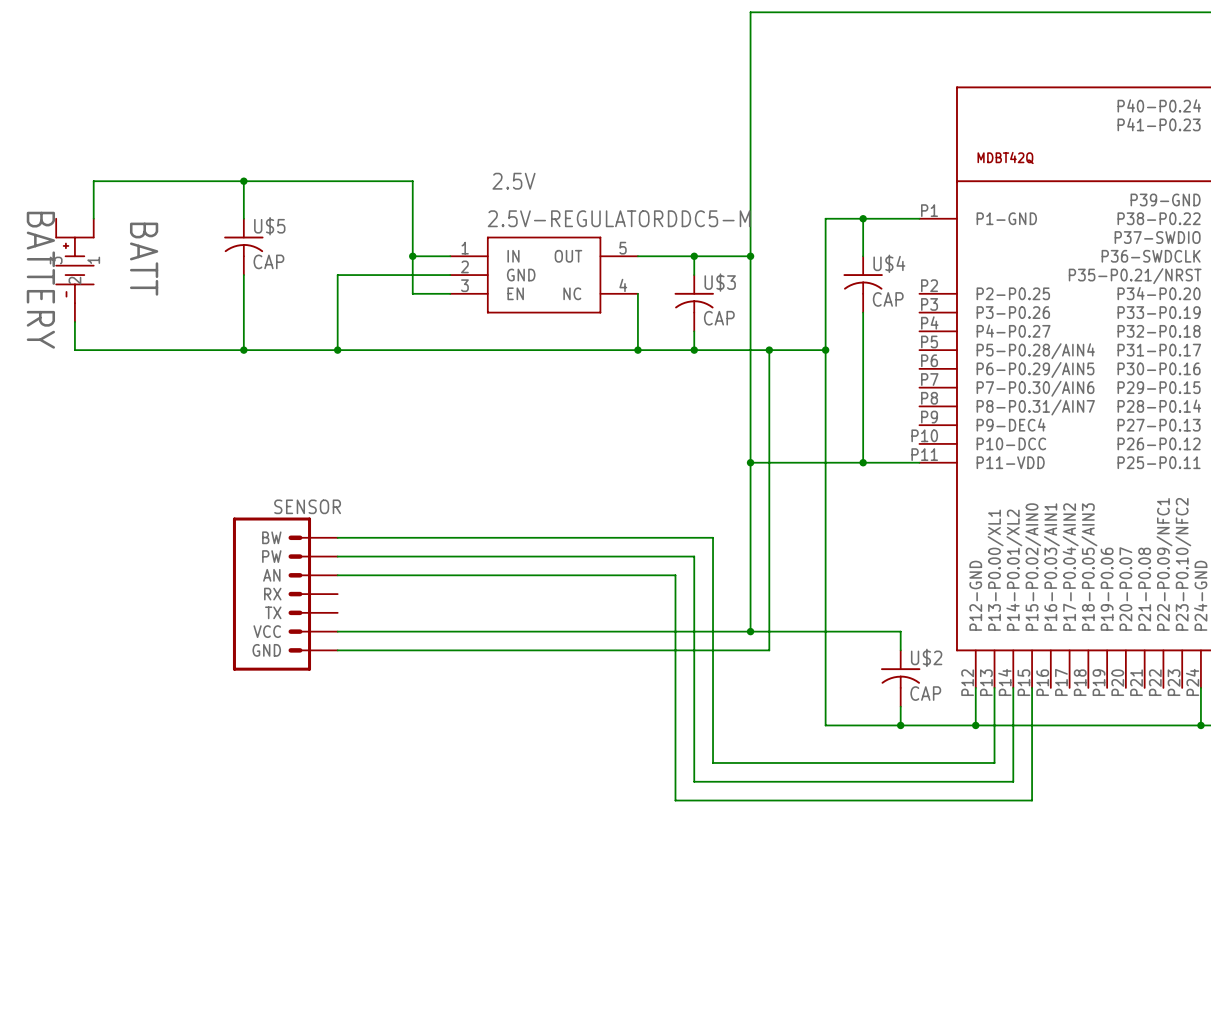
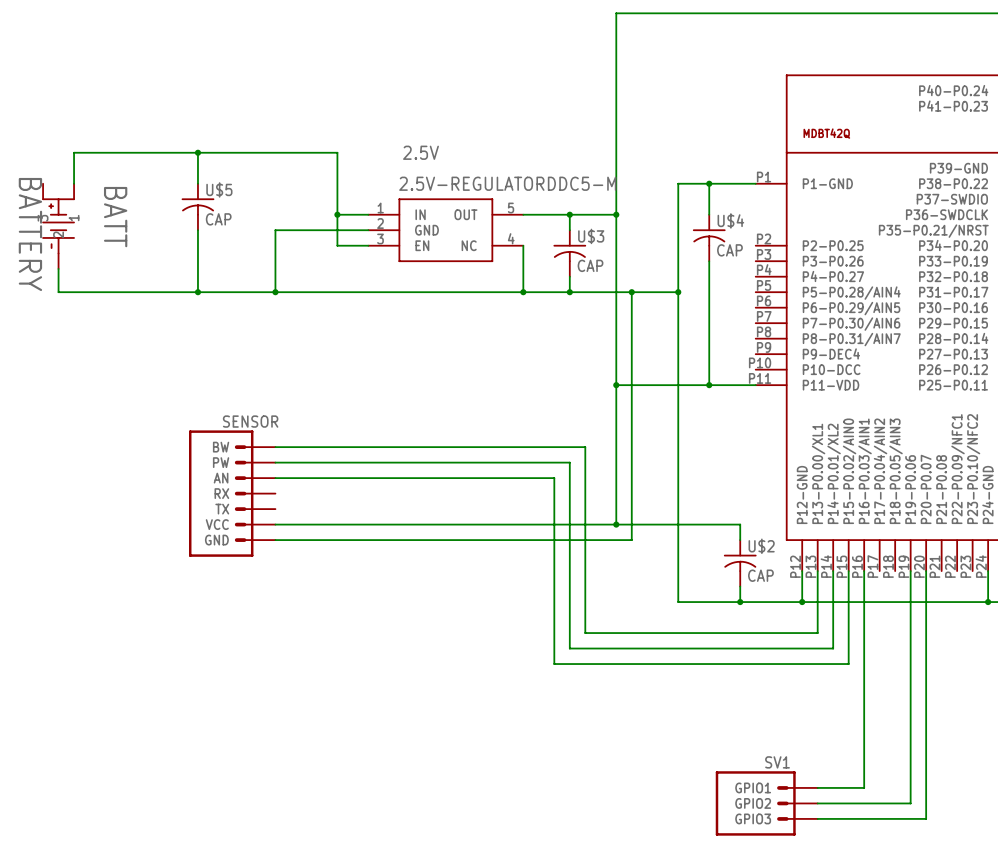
wire: none -> (864, 571) (864, 787) (817, 787)
wire: none -> (910, 571) (910, 803) (817, 803)
wire: none -> (926, 571) (926, 818) (817, 818)
SV1: none -> (766, 803)

